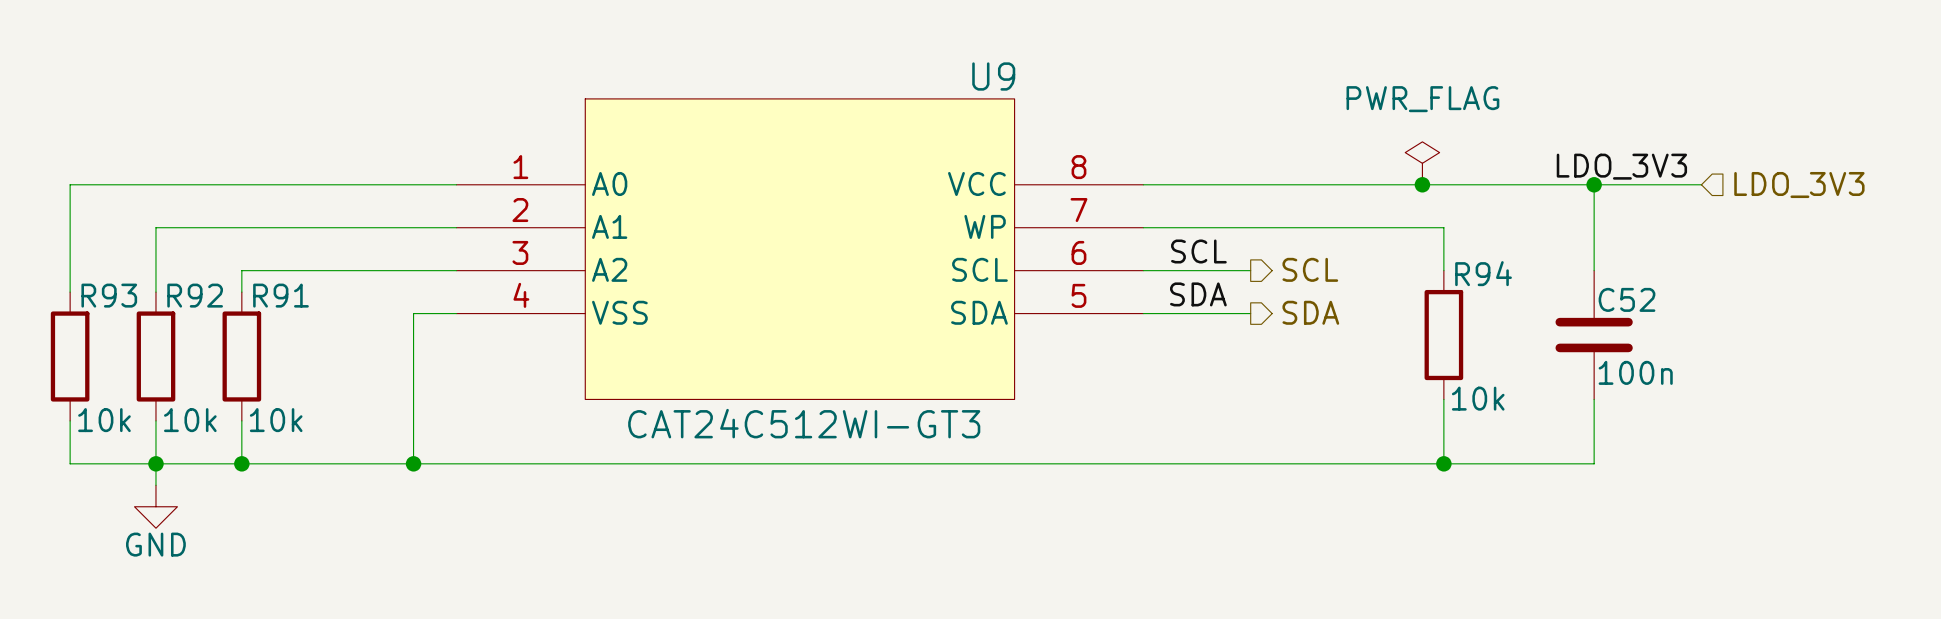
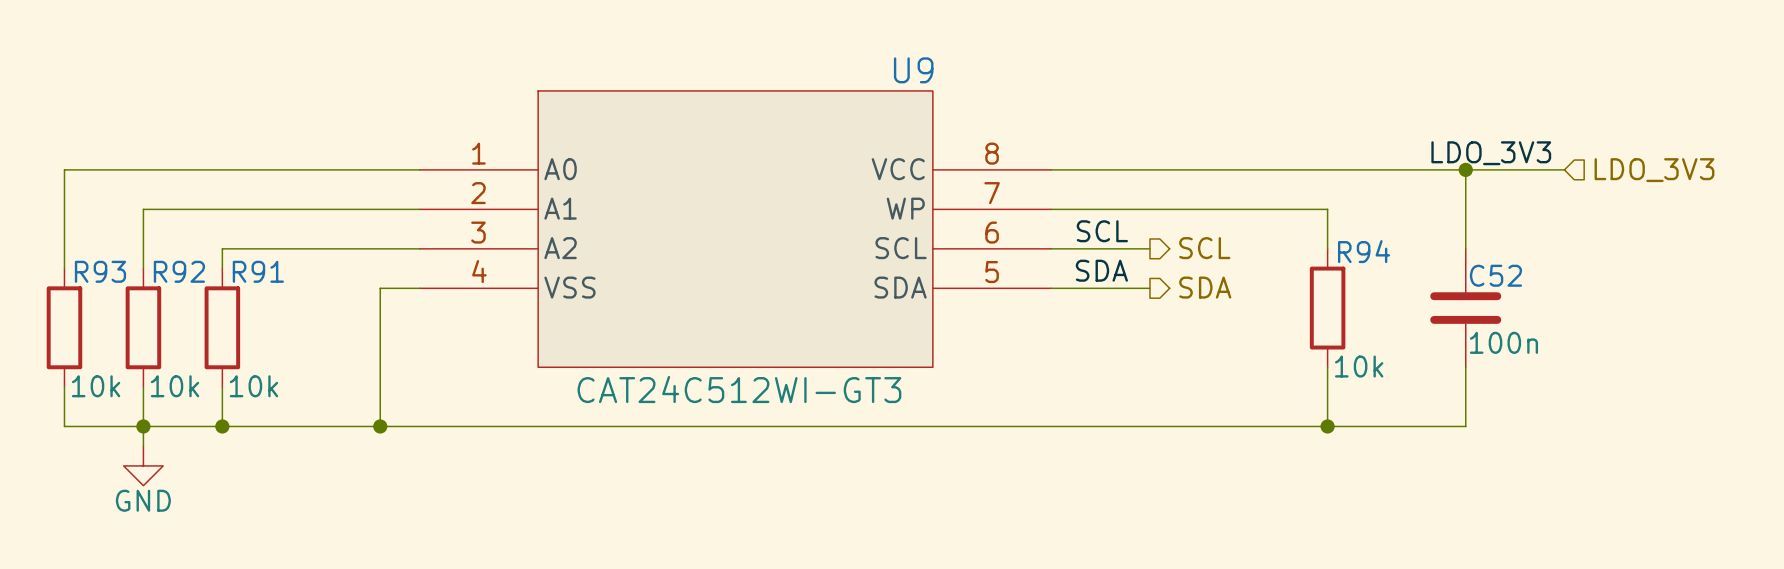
power symbol: PWR_FLAG (1422, 163) -> none
junction: (1422, 184) -> none

